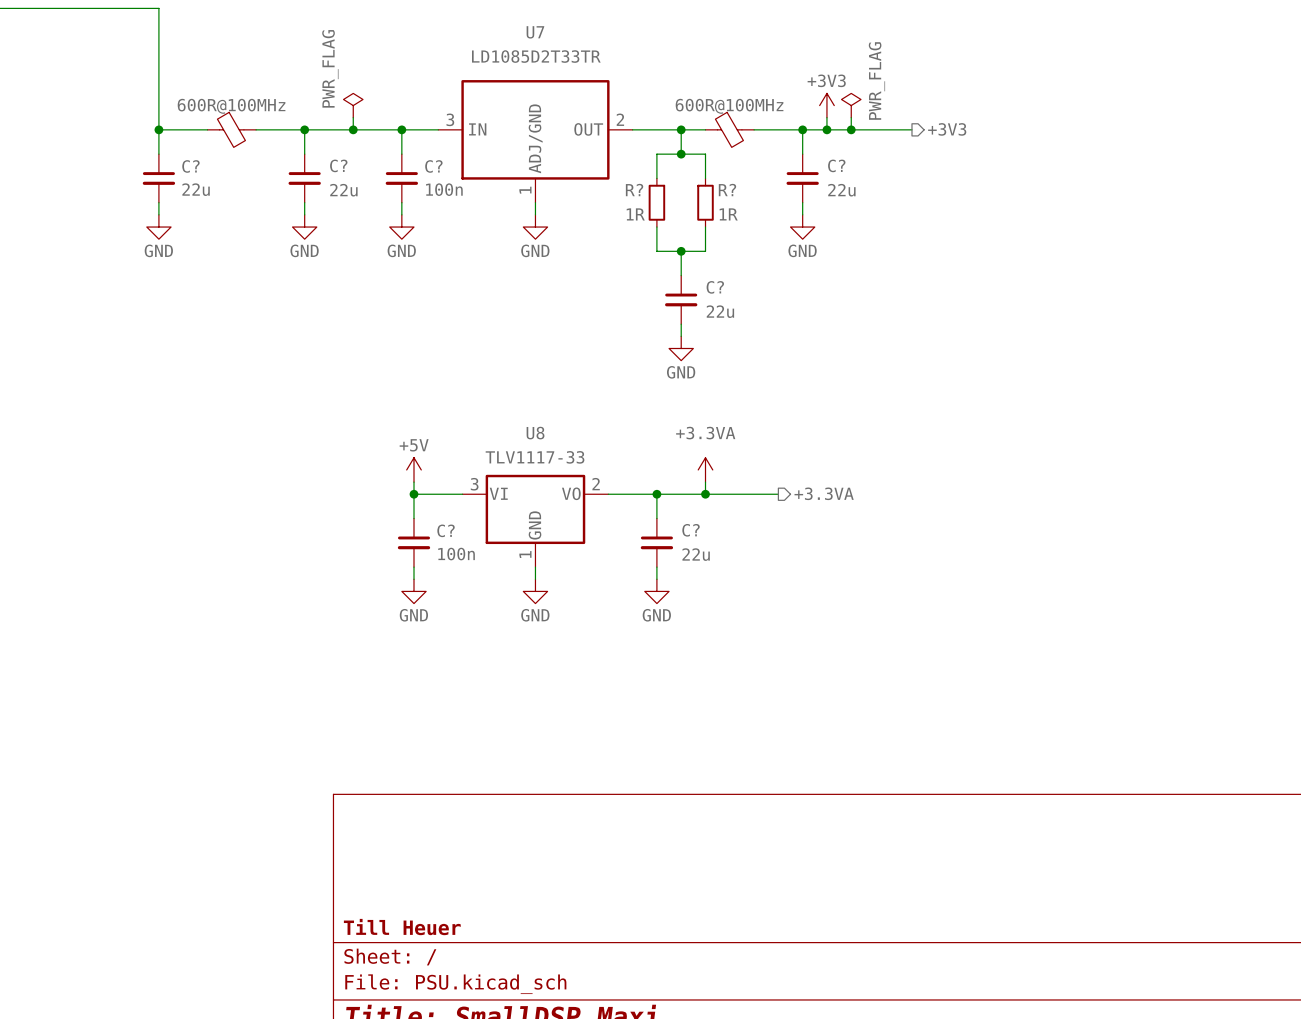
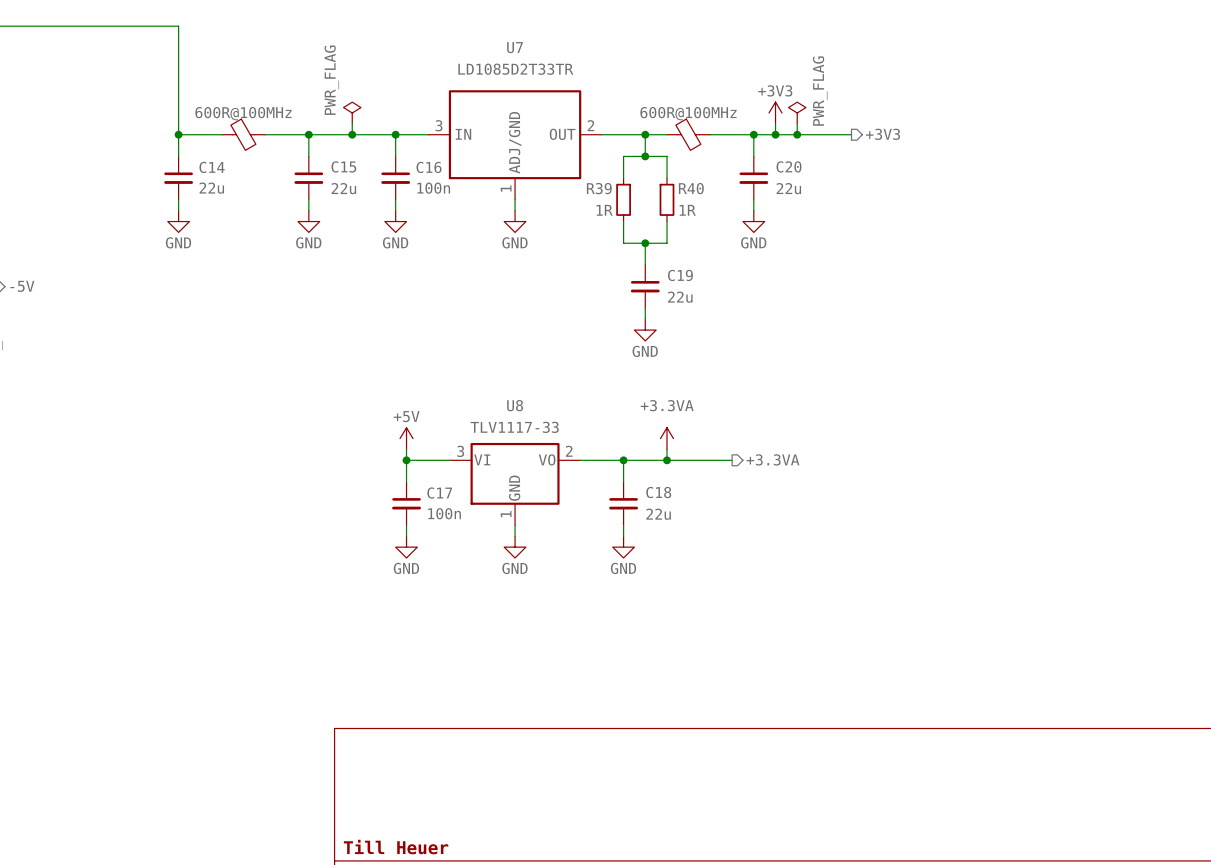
C? name: C? (338, 165) -> C15 (343, 166)
C? name: C? (836, 165) -> C20 (788, 166)
C? name: C? (190, 166) -> C14 (212, 167)
C? name: C? (433, 166) -> C16 (428, 167)
R? name: R? (634, 190) -> R39 (599, 188)
R? name: R? (727, 190) -> R40 (691, 188)
C? name: C? (715, 287) -> C19 (680, 275)
C? name: C? (446, 530) -> C17 (439, 493)
C? name: C? (691, 530) -> C18 (658, 492)

